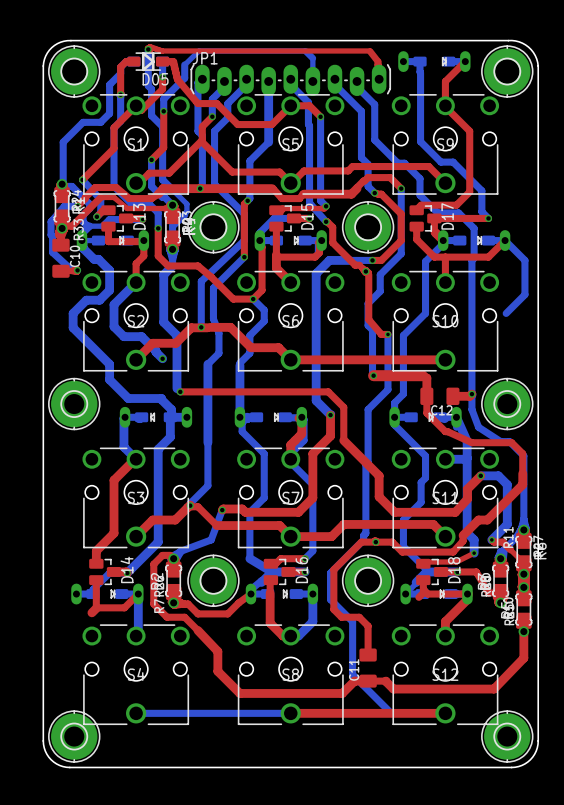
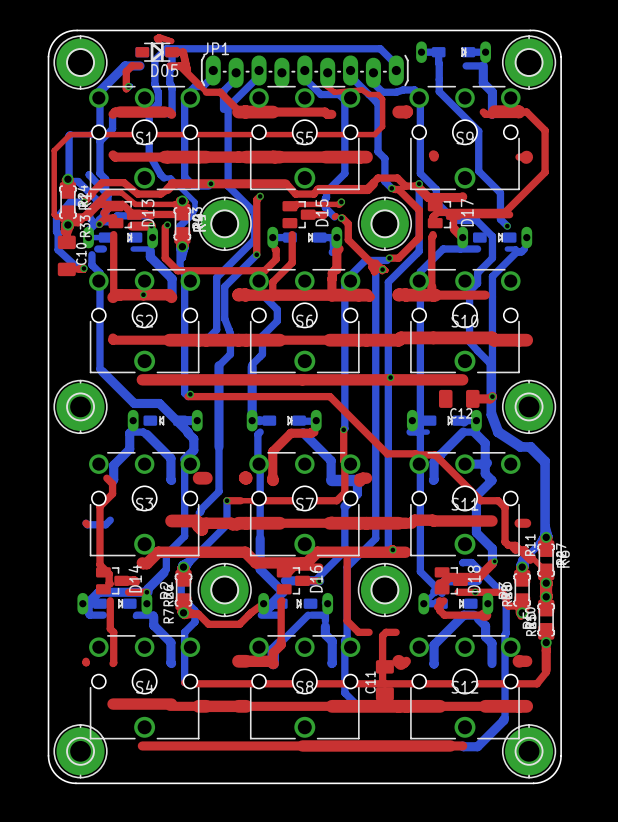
bottom track: (148, 49) (148, 85) (151, 89) (151, 115) (162, 126) (162, 179) (172, 189) -> none
via: (148, 49) -> none
top track: (162, 50) (370, 50) (378, 61) (379, 79) -> none
top track: (133, 61) (126, 61) (120, 67) (121, 94) -> none
bottom track: (133, 61) (126, 61) (120, 67) (120, 73) (109, 84) (109, 113) (100, 122) (83, 122) (64, 141) -> (140, 65) (125, 65) (99, 91) (99, 126) (91, 134) (70, 134)
top track: (465, 61) (445, 81) (445, 106) (469, 131) (469, 191) (456, 205) (421, 205) (416, 210) -> none
top track: none -> (140, 65) (132, 65) (126, 71) (126, 88)
top track: none -> (169, 65) (180, 65) (206, 92) (220, 92) (238, 112) (325, 112) (331, 114)
bottom track: none -> (169, 65) (172, 113) (167, 112) (169, 112)
bottom track: none -> (466, 65) (483, 65) (483, 83) (492, 92) (491, 114)
top track: (162, 77) (162, 89) (140, 110) -> none
via: (162, 77) -> none
top track: (177, 79) (197, 103) (216, 103) (237, 124) (271, 124) (290, 105) (309, 105) (320, 116) -> none
bottom track: none -> (210, 70) (210, 78) (202, 86) (194, 86) (184, 96) (184, 176) (193, 186) (208, 186)
bottom track: (202, 79) (202, 72) (202, 78) (197, 82) (197, 131) (202, 135) (202, 186) (200, 188) -> none
bottom track: none -> (302, 70) (302, 76) (320, 94) (339, 94) (344, 100) (344, 173) (326, 191) (325, 198) (325, 207) (334, 216)
bottom track: (290, 79) (290, 84) (308, 102) (309, 202) (326, 221) -> none
bottom track: none -> (394, 70) (394, 62) (380, 48) (166, 48) (154, 60) (154, 84) (158, 92) (158, 103) (149, 112) (149, 154) (160, 174) (164, 178) (170, 178) (194, 202) (194, 210) (180, 226) (180, 268) (184, 273) (184, 393) (188, 396)
bottom track: (268, 81) (268, 142) (249, 161) (249, 198) (247, 200) -> none
top track: none -> (325, 72) (325, 85) (334, 92) (362, 89) (368, 94) (378, 94) (382, 99) (382, 126) (374, 134) (70, 134) (54, 150) (54, 214) (56, 216) (86, 216) (98, 204) (122, 204) (132, 213) (180, 214) (180, 204)
bottom track: (312, 81) (312, 58) (305, 50) (199, 50) (184, 64) (184, 78) (163, 99) (163, 111) -> none
bottom track: none -> (371, 72) (371, 80) (382, 92) (414, 89) (420, 95) (420, 173) (436, 189) (436, 202) (454, 220) (476, 220) (492, 236) (492, 258) (477, 273) (477, 283) (469, 291) (469, 341) (490, 363) (490, 414) (497, 433) (519, 448) (529, 448) (543, 462) (543, 539)
bottom track: (357, 81) (357, 86) (374, 104) (374, 140) (397, 163) (404, 163) (420, 178) (420, 195) (437, 212) (458, 212) (474, 228) (471, 278) -> (524, 249) (521, 251) (517, 251) (492, 276)
bottom track: (120, 94) (120, 121) (114, 127) (114, 186) (131, 204) (149, 204) (158, 212) (158, 228) -> none
bottom track: (420, 99) (420, 141) (441, 162) (453, 162) (481, 190) (481, 211) (488, 218) -> (439, 91) (478, 131) (478, 171) (500, 192) (500, 219) (507, 226)
bottom track: (227, 103) (227, 117) (214, 131) (214, 184) (244, 214) (244, 240) (201, 281) (201, 327) -> (239, 95) (228, 107) (228, 186) (254, 212) (254, 239) (216, 277) (216, 329) (206, 340) (197, 340)
top track: (140, 110) (139, 102) (114, 127) (114, 148) (82, 179) -> none
top track: (163, 111) (163, 147) (151, 159) -> none
via: (163, 111) -> none
top track: (212, 116) (202, 126) (202, 140) -> none
via: (212, 116) -> none
bottom track: (320, 116) (320, 200) (326, 206) -> none
via: (320, 116) -> none
top track: none -> (406, 111) (398, 112)
top track: none -> (483, 112) (485, 114) (491, 114) (494, 111) (526, 112) (545, 130) (545, 172) (505, 212) (437, 212) (432, 217)
top track: none -> (113, 114) (115, 112) (169, 112) (171, 114)
bottom track: none -> (112, 117) (112, 128) (99, 141) (99, 173) (105, 179) (105, 213) (99, 219) (99, 224)
top track: (202, 140) (169, 173) (149, 173) (139, 183) (136, 183) -> none
top track: (202, 140) (202, 142) (232, 172) (279, 172) (290, 183) (304, 170) (348, 170) (352, 166) (428, 166) (445, 183) -> none
bottom track: (151, 159) (151, 186) (172, 205) -> none
via: (151, 159) -> none
top track: none -> (113, 154) (115, 157) (327, 157)
top track: none -> (433, 154) (434, 157)
top track: none -> (325, 157) (366, 157)
top track: none -> (519, 157) (526, 157)
via: (82, 179) -> none
bottom track: (163, 180) (186, 204) (186, 211) (172, 226) (172, 265) (163, 274) (163, 322) (176, 335) (176, 388) (180, 391) -> none
top track: (361, 183) (368, 177) (390, 177) (401, 188) -> (378, 178) (397, 178) (405, 186) (416, 186) (428, 197) (462, 196)
via: (96, 216) -> none
bottom track: (309, 218) (274, 218) (259, 232) (260, 241) -> none
via: (309, 218) -> none
via: (488, 218) -> none
via: (142, 219) -> none
top track: none -> (336, 215) (334, 216) (335, 215)
top track: none -> (113, 217) (105, 218) (98, 224)
top track: (108, 226) (108, 241) (143, 240) (143, 256) (136, 263) (136, 282) -> none
top track: (276, 226) (276, 268) (290, 282) -> none
top track: (416, 226) (416, 239) (434, 257) (488, 257) (505, 240) -> none
via: none -> (99, 224)
top track: (158, 228) (158, 256) (168, 265) (197, 265) (233, 299) (253, 299) (262, 290) (262, 247) (259, 240) -> none
top track: none -> (132, 226) (151, 226)
via: none -> (151, 226)
via: none -> (507, 226)
top track: none -> (165, 227) (165, 258) (177, 270) (264, 270) (276, 259) (275, 249)
top track: none -> (113, 234) (113, 297) (115, 294) (168, 294) (171, 297)
top track: none -> (292, 234) (292, 262) (272, 282) (272, 297) (279, 294)
top track: none -> (432, 234) (431, 295) (433, 297) (434, 295)
bottom track: (81, 240) (83, 248) (109, 270) (109, 290) (99, 300) (86, 300) (73, 313) (73, 327) (109, 364) (109, 379) (128, 398) (161, 398) (171, 409) (170, 437) (158, 449) (158, 542) (127, 573) (109, 573) (93, 589) (93, 594) (84, 594) -> none
top track: (321, 240) (319, 242) (319, 252) (315, 257) (276, 257) -> none
bottom track: (459, 240) (443, 240) (443, 243) (425, 261) (425, 313) (403, 335) (403, 394) (394, 402) (394, 417) (411, 417) -> none
bottom track: (488, 240) (505, 240) (524, 260) (524, 294) (506, 313) -> none
bottom track: none -> (97, 249) (103, 249)
bottom track: none -> (133, 249) (150, 249) (150, 257) (172, 278) (171, 297)
top track: none -> (339, 249) (336, 251) (336, 269) (332, 273) (331, 297)
bottom track: none -> (477, 249) (443, 249) (420, 271) (420, 571) (442, 593)
bottom track: none -> (507, 249) (515, 249) (518, 251)
bottom track: none -> (91, 254) (91, 265) (99, 273) (99, 369) (134, 403) (159, 403) (188, 433)
top track: (445, 257) (445, 282) -> none
bottom track: (372, 260) (329, 260) (316, 273) (316, 400) (330, 415) (331, 413) -> none
bottom track: none -> (387, 260) (365, 260) (344, 281) (343, 429)
top track: none -> (370, 267) (374, 272) (375, 271) (376, 270) (370, 267)
bottom track: none -> (375, 271) (375, 538) (347, 567) (344, 692) (359, 706) (357, 706)
top track: (368, 274) (368, 319) (381, 334) (387, 334) -> none
bottom track: (380, 274) (380, 291) (368, 303) (368, 325) (372, 330) (373, 375) -> (397, 273) (388, 282) (388, 552)
bottom track: (136, 282) (114, 304) (114, 326) (123, 336) (141, 336) (162, 358) -> none
via: none -> (143, 294)
top track: none -> (366, 294) (368, 297) (370, 297) (368, 295) (366, 295) (245, 295) (245, 294) (238, 295)
top track: none -> (398, 295) (485, 295)
via: (253, 299) -> none
via: (201, 327) -> none
bottom track: (387, 334) (387, 389) (368, 409) (365, 533) (363, 539) (330, 573) (330, 599) (352, 621) (352, 674) (391, 713) (445, 713) -> none
via: (387, 334) -> none
top track: none -> (112, 338) (112, 340) (398, 340) (401, 337) (491, 337) (494, 340) (526, 340)
via: (162, 358) -> none
top track: (136, 359) (152, 343) (175, 343) (191, 327) (207, 327) (201, 327) (230, 327) (250, 347) (278, 347) (290, 359) (445, 359) -> none
top track: (373, 375) (422, 375) (426, 378) (426, 413) (445, 431) (471, 442) (511, 442) (522, 453) (522, 484) (487, 520) (478, 520) (463, 535) -> none
top track: none -> (142, 379) (462, 379)
top track: (180, 391) (328, 391) (343, 407) (343, 440) (379, 475) (379, 496) (394, 512) (455, 512) (467, 499) (467, 489) (480, 475) -> none
top track: none -> (188, 396) (329, 396) (387, 453) (435, 454) (481, 500) (498, 500) (505, 507) (505, 541) (508, 545) (515, 545) (530, 560)
top track: (330, 415) (330, 436) (312, 453) (312, 497) (298, 512) (245, 512) (242, 508) (222, 510) -> none
via: (330, 415) -> none
bottom track: (142, 417) (140, 419) (137, 417) (123, 418) (123, 447) (136, 459) -> none
bottom track: (249, 417) (242, 422) (242, 431) (264, 453) (264, 497) (249, 512) (249, 558) (271, 571) (250, 589) (250, 594) (267, 594) -> none
bottom track: (285, 417) (301, 417) (304, 419) (304, 440) (290, 453) (290, 462) (312, 484) (312, 550) (305, 558) -> none
bottom track: (395, 417) (394, 425) (425, 455) (425, 478) (421, 482) (421, 502) (403, 520) (403, 546) (425, 568) (425, 573) -> none
bottom track: (456, 417) (467, 441) (467, 532) (474, 539) (474, 553) -> none
top track: (299, 418) (301, 417) (301, 433) (290, 444) (290, 459) -> none
top track: none -> (343, 429) (344, 492) (336, 500) (226, 500)
via: none -> (343, 429)
bottom track: none -> (260, 432) (257, 434) (257, 459) (260, 461) (260, 569) (283, 592) (266, 611) (270, 615) (278, 615) (261, 615)
bottom track: none -> (296, 432) (313, 432) (303, 432) (331, 460) (331, 480) (359, 481)
top track: none -> (313, 432) (291, 433) (272, 451) (273, 480)
bottom track: none -> (410, 432) (427, 432)
bottom track: none -> (188, 433) (193, 438) (193, 450) (184, 459) (184, 536) (166, 554) (166, 569) (148, 588) (148, 592) (98, 592) (89, 602) (89, 614) (103, 615)
top track: (136, 459) (114, 480) (114, 533) (96, 550) (95, 563) -> none
top track: none -> (106, 478) (112, 483) (112, 493) (99, 506) (99, 564) (109, 573) (110, 583)
top track: none -> (198, 478) (206, 478)
top track: none -> (245, 478) (246, 478)
top track: none -> (358, 478) (366, 478) (362, 478) (359, 481)
bottom track: none -> (113, 480) (113, 465) (129, 449) (130, 432) (143, 432) (170, 458) (171, 480)
bottom track: none -> (355, 480) (357, 482) (357, 493) (344, 506) (344, 551) (317, 578)
bottom track: none -> (433, 480) (434, 461) (463, 432) (474, 432) (485, 443) (485, 473) (491, 480) (476, 496) (476, 532) (492, 548) (492, 563)
bottom track: (480, 475) (498, 475) (507, 484) (507, 524) (491, 539) -> none
via: (480, 475) -> none
bottom track: none -> (226, 500) (226, 524) (181, 570) (181, 596) (194, 610) (194, 622) (184, 632) (184, 682)
via: none -> (226, 500)
top track: (190, 505) (175, 520) (152, 520) (136, 536) -> none
via: (190, 505) -> none
top track: (187, 507) (190, 505) (197, 506) (216, 525) (279, 525) (290, 536) (331, 536) (343, 524) (433, 524) (445, 536) -> none
bottom track: (222, 510) (211, 539) (181, 551) -> none
via: (222, 510) -> none
bottom track: none -> (110, 520) (105, 524) (87, 524)
top track: none -> (171, 520) (196, 520) (201, 526) (201, 529) (198, 526) (198, 523) (232, 524) (406, 523)
top track: none -> (491, 521) (414, 520) (411, 523) (406, 523)
top track: none -> (86, 523) (87, 524)
top track: none -> (519, 523) (526, 523)
top track: (463, 534) (463, 541) (453, 552) (402, 552) (392, 542) (361, 542) (333, 569) (333, 609) (341, 617) (359, 617) (368, 626) (368, 655) -> none
via: (491, 539) -> none
top track: none -> (347, 552) (347, 620) (358, 632) (369, 632)
top track: none -> (405, 552) (317, 552) (305, 563) (255, 562) (245, 552) (158, 552) (146, 563) (142, 562)
top track: (474, 553) (456, 562) (427, 562) (423, 563) -> none
bottom track: none -> (462, 562) (471, 562) (506, 596) (505, 718) (477, 746) (462, 745)
top track: none -> (492, 563) (478, 577) (448, 577) (442, 583) (439, 583)
top track: (173, 558) (170, 555) (162, 555) (153, 564) (153, 603) (167, 617) (184, 617) (197, 630) (217, 651) (217, 671) (239, 693) (342, 693) (354, 681) (385, 681) (393, 689) (494, 689) (523, 658) -> (184, 682) (537, 683) (546, 670)
via: (305, 558) -> none
top track: (441, 571) (476, 571) (488, 592) (500, 593) (500, 602) -> none
via: (457, 571) -> none
via: (127, 573) -> none
top track: (96, 580) (96, 607) -> none
top track: (270, 580) (270, 623) (283, 636) (290, 636) -> none
top track: (423, 580) (423, 589) (427, 594) (467, 594) (467, 599) (445, 621) (445, 636) -> none
top track: none -> (128, 592) (146, 592)
via: none -> (146, 592)
top track: none -> (458, 592) (501, 592) (506, 596) (506, 603) (508, 606) (521, 606) (521, 616)
via: none -> (475, 592)
top track: none -> (110, 600) (110, 628) (113, 632) (113, 663)
top track: none -> (281, 600) (281, 644) (273, 652) (273, 663) (270, 661) (238, 661)
top track: none -> (439, 600) (439, 610) (444, 615) (485, 615)
bottom track: (121, 594) (138, 594) (138, 633) (136, 636) -> none
bottom track: (296, 594) (312, 594) (312, 621) (298, 636) (290, 636) -> none
top track: (137, 595) (138, 594) (124, 607) (96, 607) -> none
bottom track: none -> (135, 616) (153, 615) (153, 625) (170, 642) (171, 663)
top track: (96, 607) (91, 612) -> none
bottom track: none -> (478, 618) (485, 626) (485, 636) (491, 643) (491, 663)
bottom track: none -> (478, 618) (476, 615) (463, 615) (434, 644) (433, 663)
top track: none -> (396, 632) (386, 632) (382, 635) (382, 681) (384, 683)
top track: none -> (86, 661) (86, 662)
top track: none -> (398, 661) (401, 663) (406, 661)
top track: none -> (519, 661) (526, 661)
bottom track: none -> (273, 663) (273, 650) (308, 615) (325, 615) (325, 634) (332, 641) (331, 663)
top track: none -> (113, 704) (238, 706)
top track: none -> (238, 706) (526, 706)
bottom track: (136, 713) (290, 713) -> none
top track: (290, 713) (445, 713) -> none
top track: none -> (142, 745) (462, 745)

